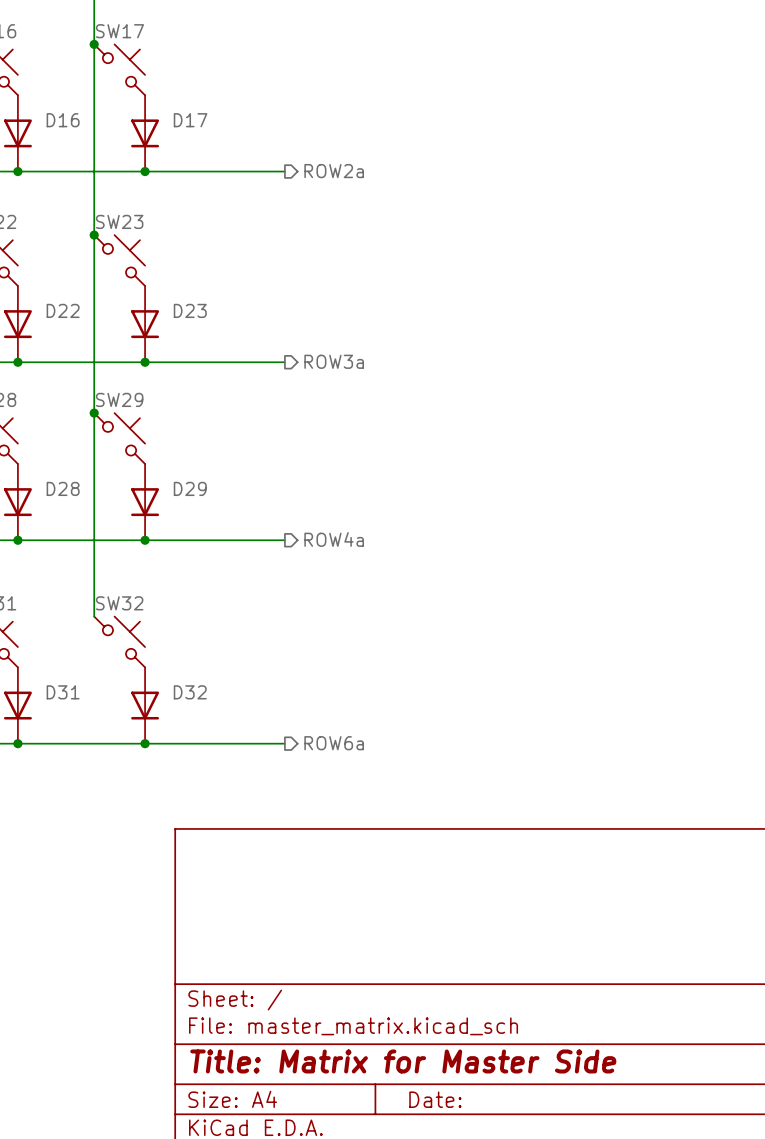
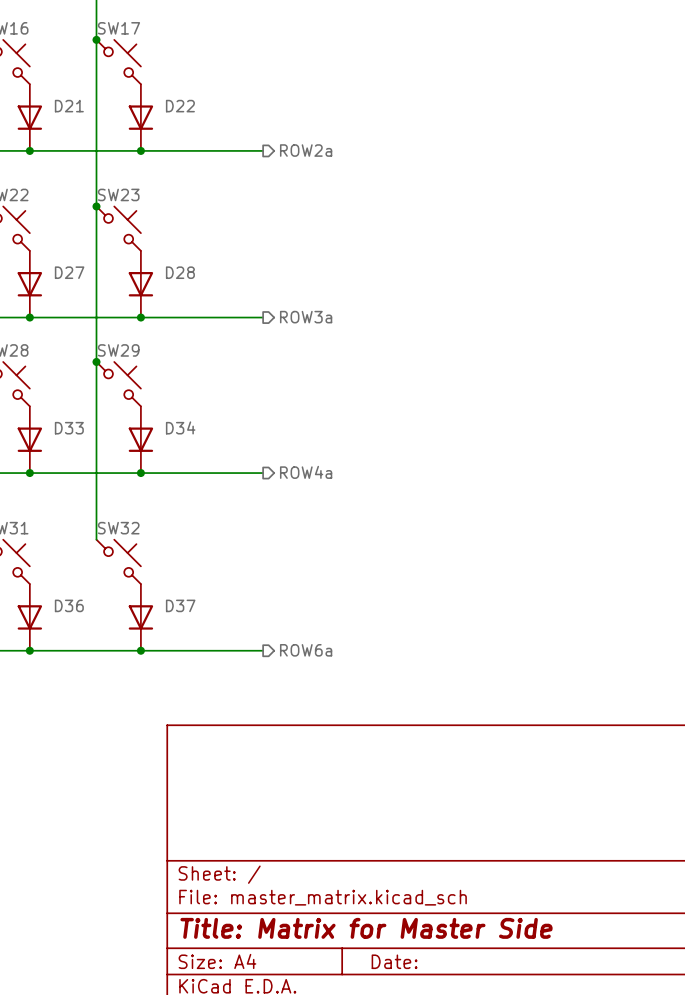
D16 name: D16 (63, 120) -> D21 (69, 106)
D17 name: D17 (190, 120) -> D22 (180, 106)
D22 name: D22 (63, 310) -> D27 (69, 272)
D23 name: D23 (190, 310) -> D28 (180, 272)
D28 name: D28 (63, 488) -> D33 (69, 428)
D29 name: D29 (190, 488) -> D34 (180, 427)
D31 name: D31 (63, 692) -> D36 (69, 605)
D32 name: D32 (190, 692) -> D37 (180, 605)

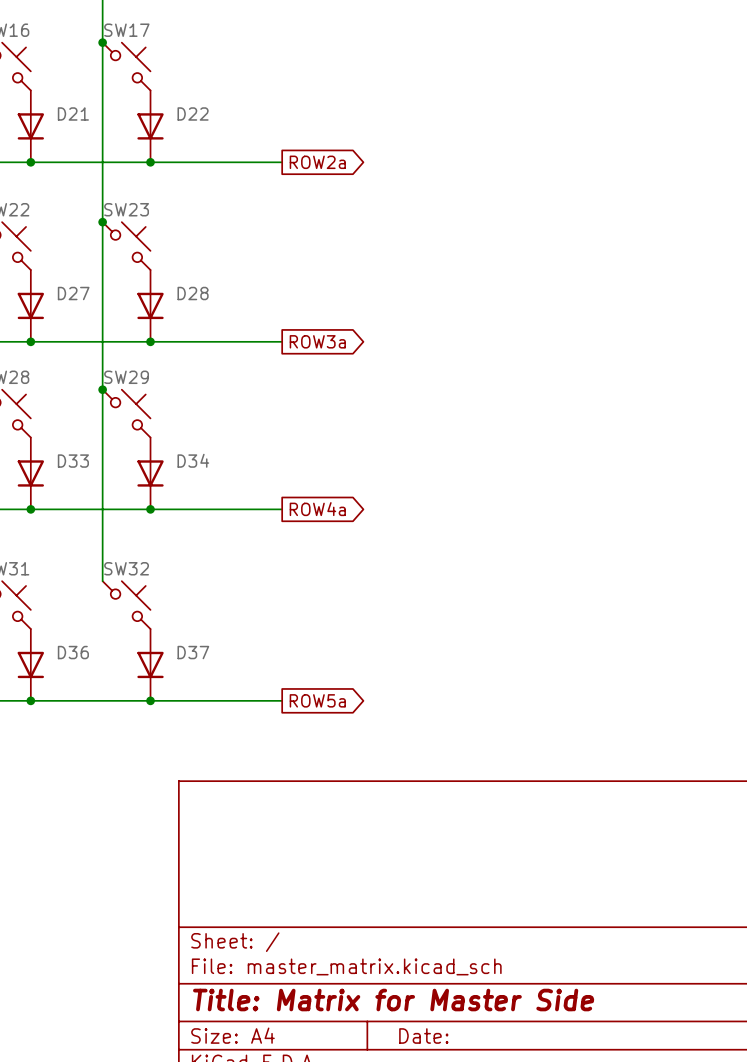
global label: none -> ROW2a (317, 162)
hierarchical label: ROW2a (306, 150) -> none
global label: none -> ROW3a (317, 341)
hierarchical label: ROW3a (306, 317) -> none
global label: none -> ROW4a (317, 509)
hierarchical label: ROW4a (306, 472) -> none
global label: none -> ROW5a (317, 700)
hierarchical label: ROW6a (306, 650) -> none

